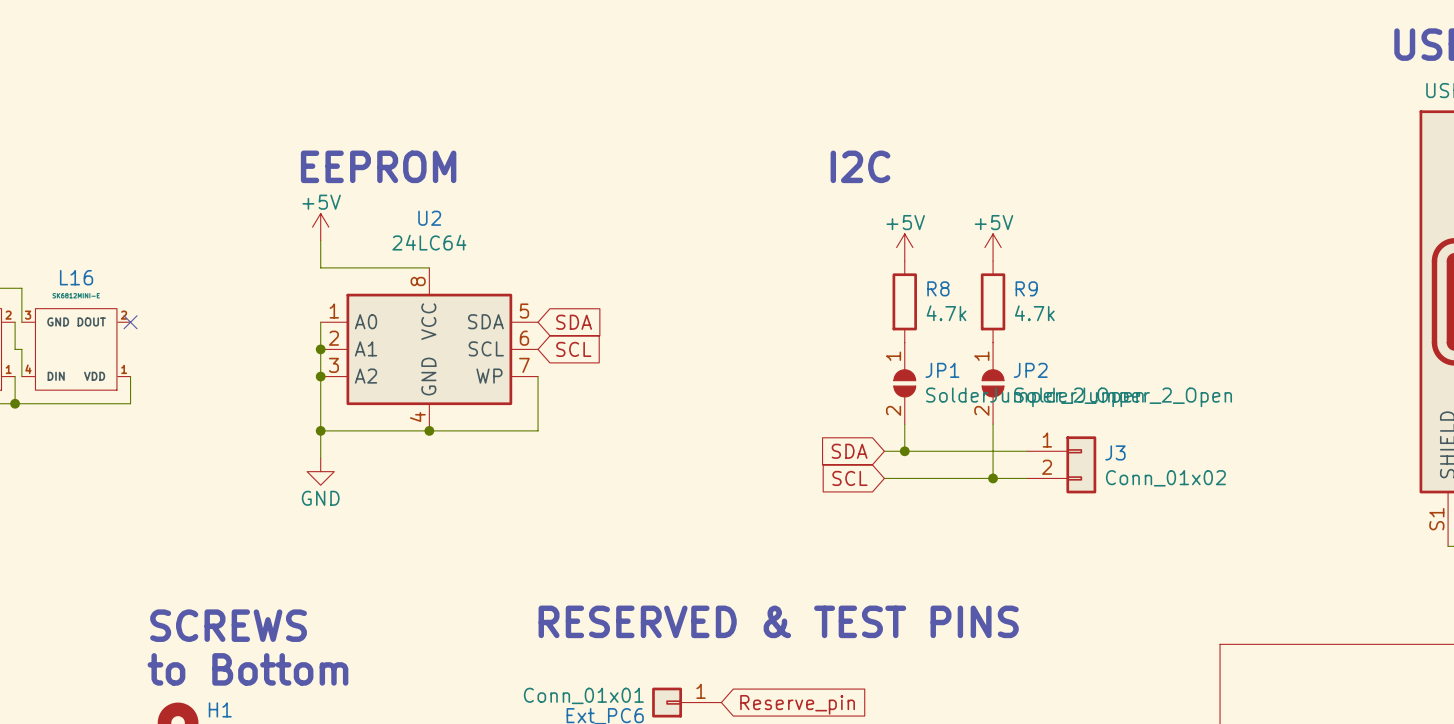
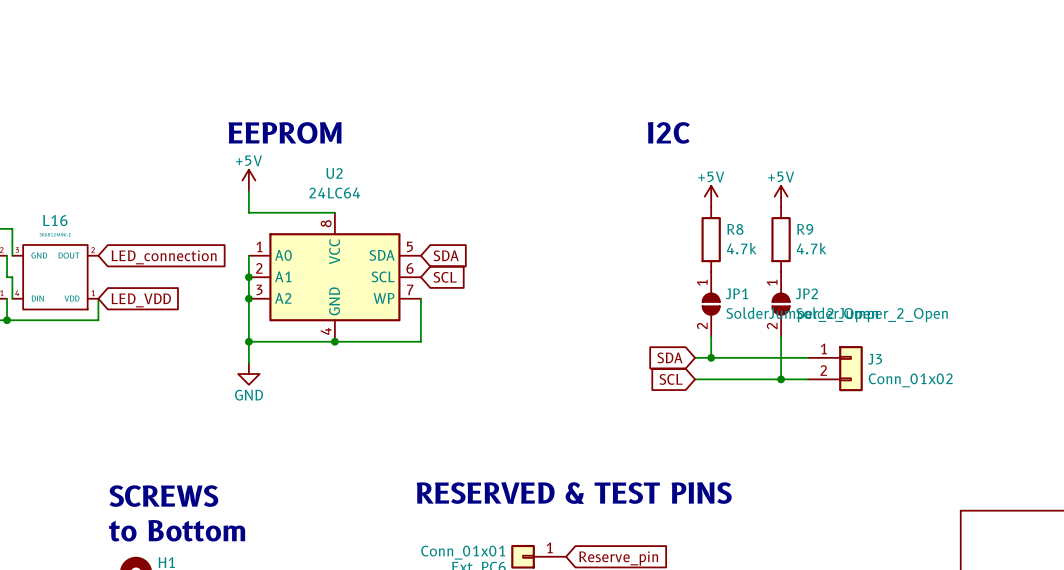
no-connect mark: (130, 322) -> none
global label: none -> LED_connection (164, 257)
global label: none -> LED_VDD (141, 300)

